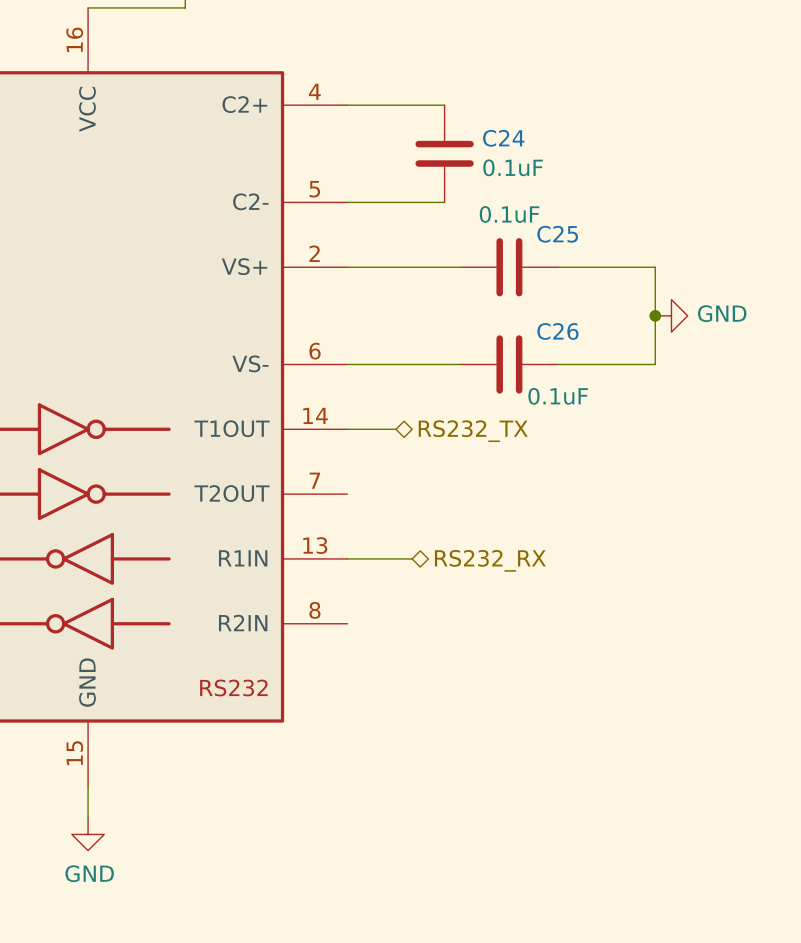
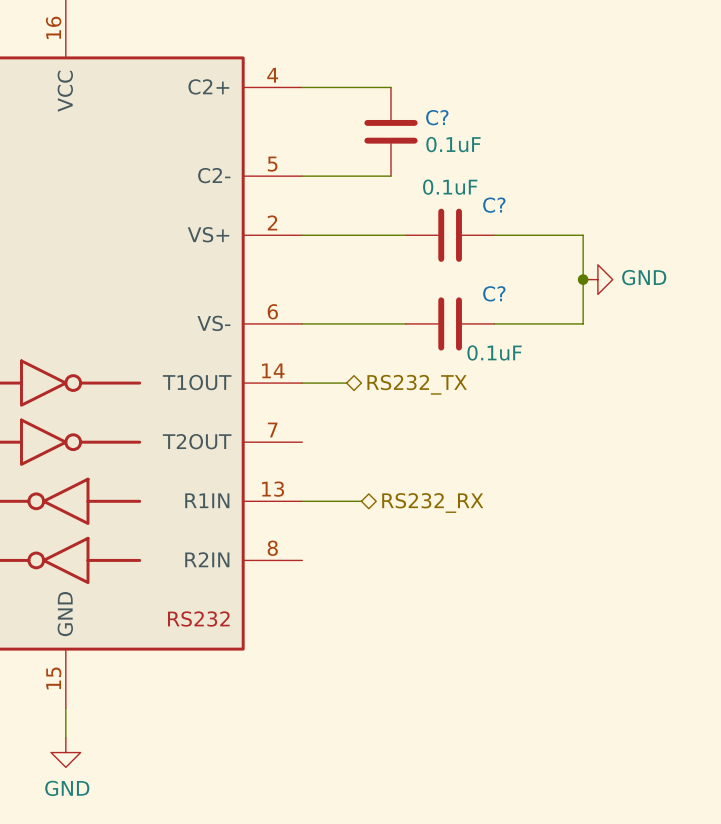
C24 name: C24 (503, 138) -> C? (437, 117)
C25 name: C25 (557, 234) -> C? (494, 205)
C26 name: C26 (557, 331) -> C? (494, 293)

